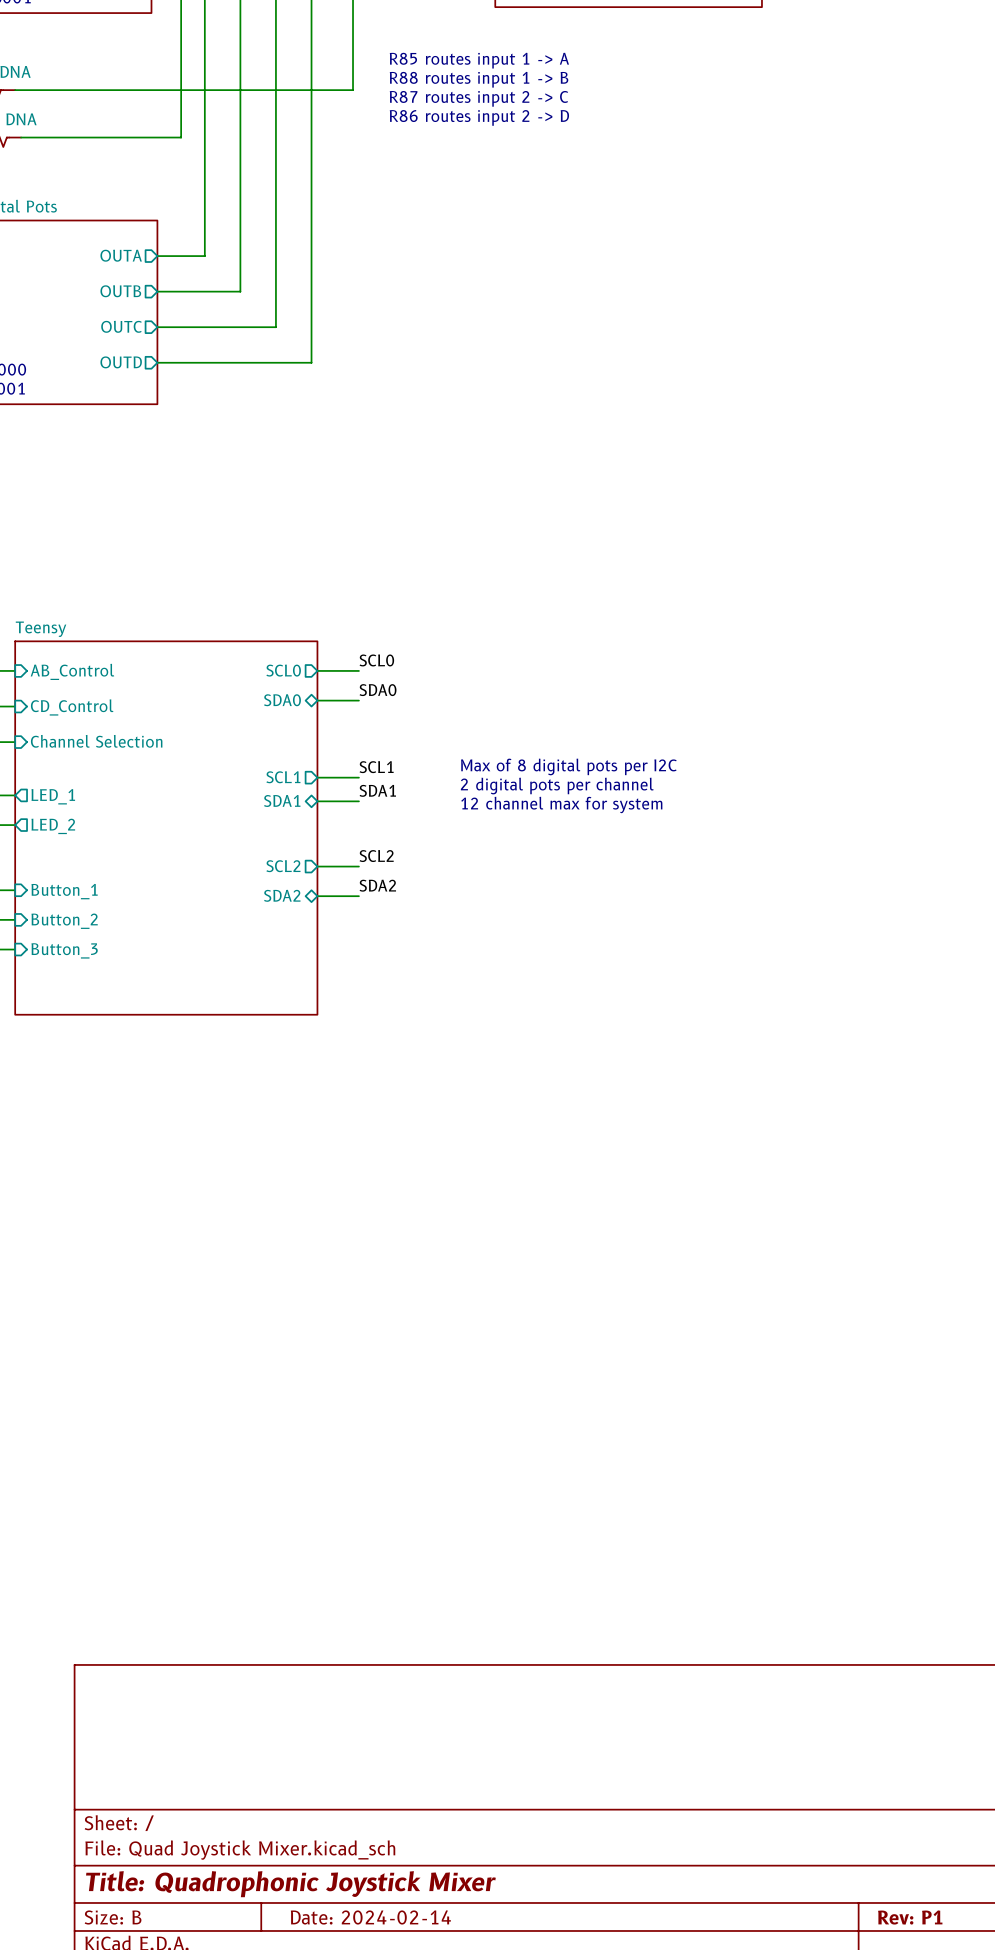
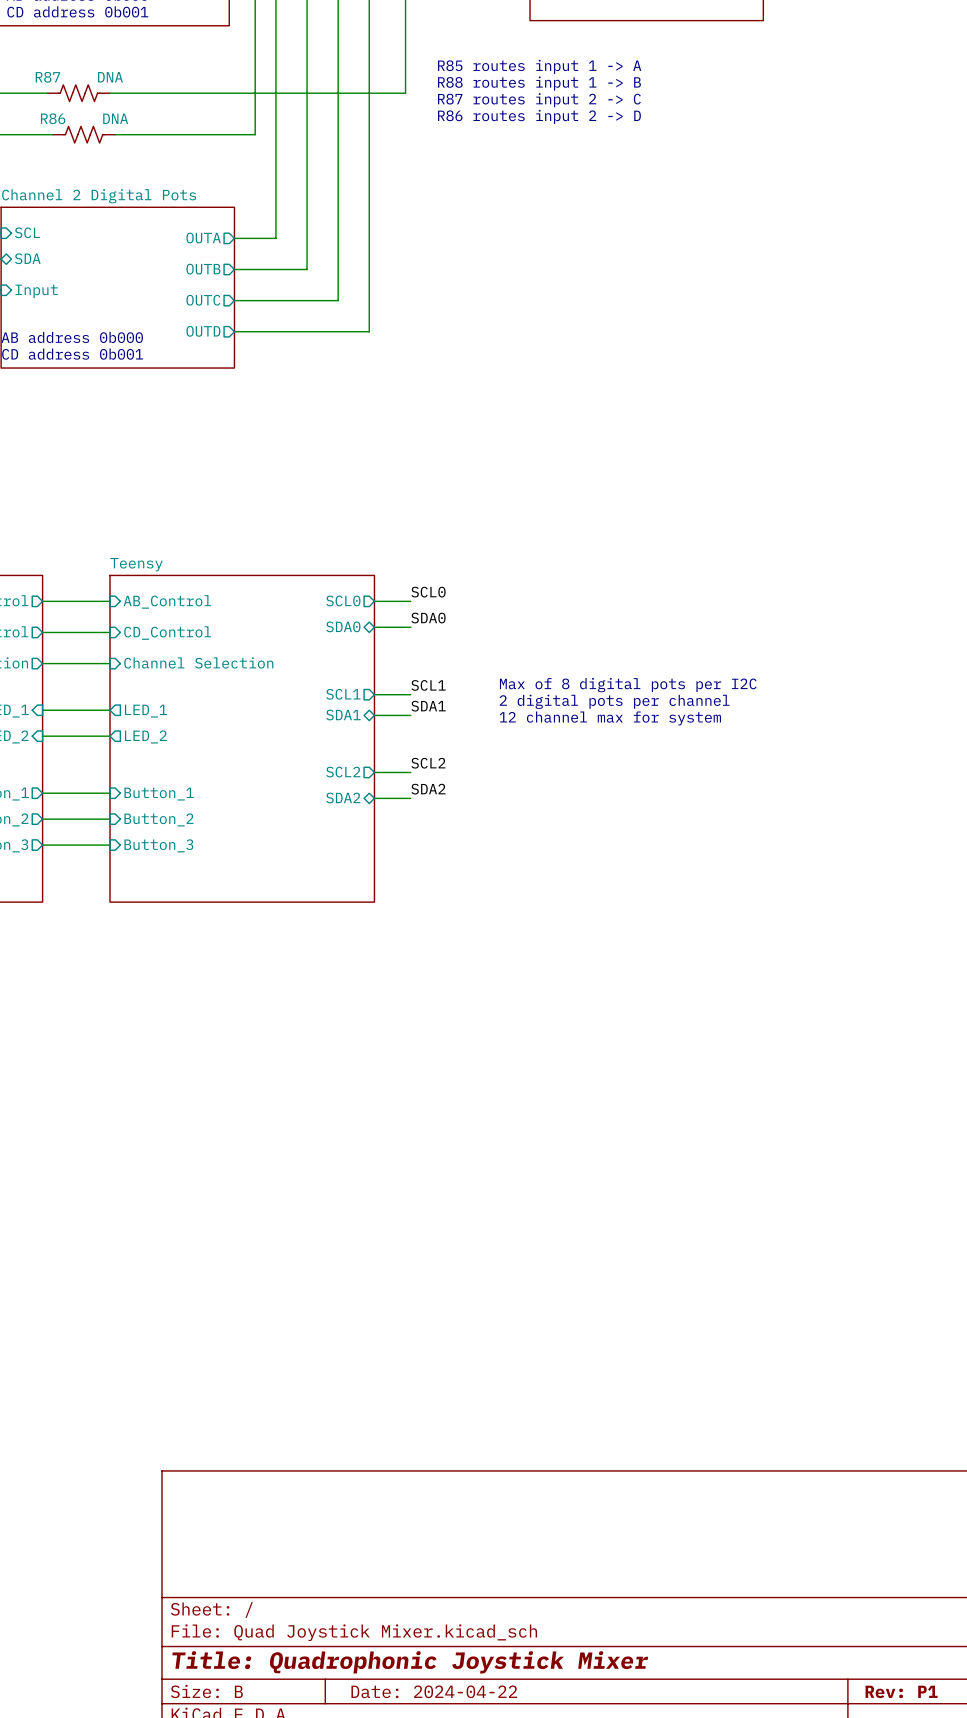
title block: Date: 2024-02-14 (370, 1917) -> Date: 2024-04-22 (434, 1691)

